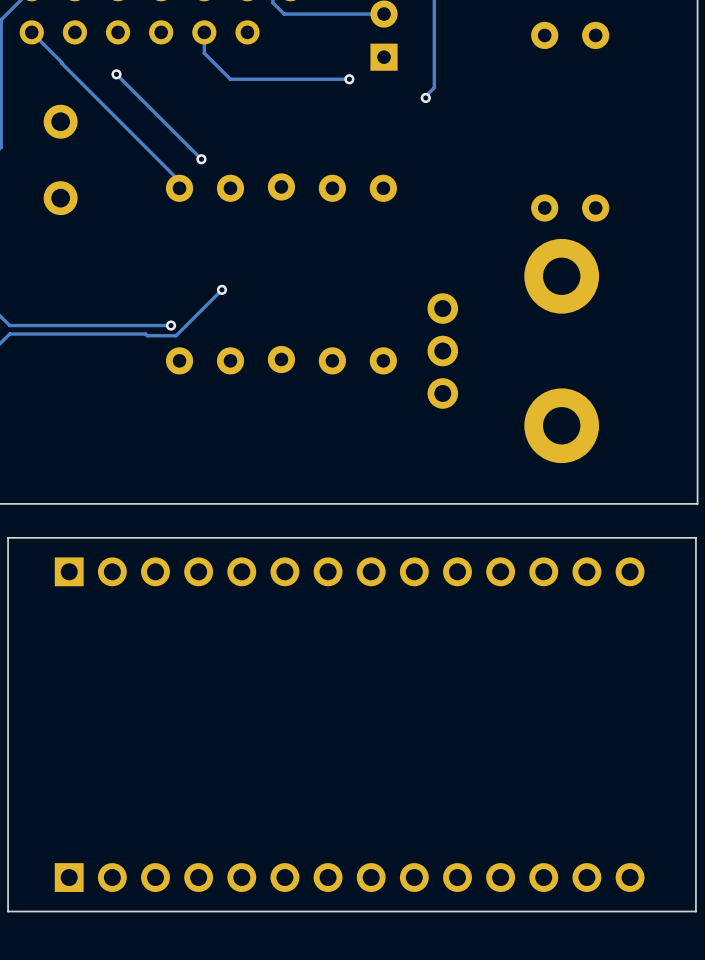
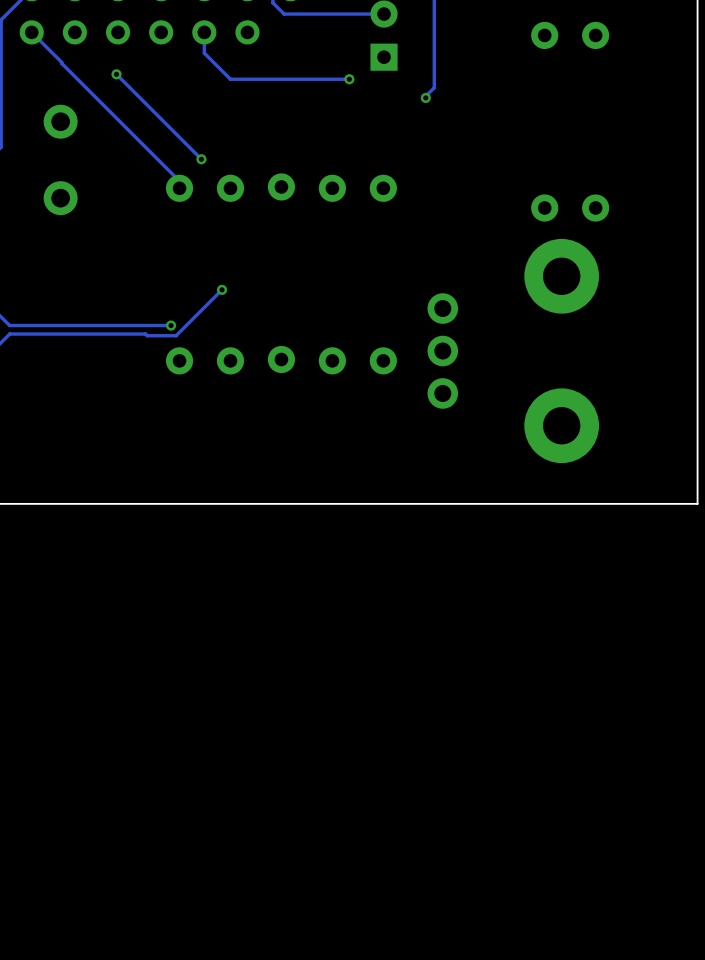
board edge: (695, 537) (8, 537) (8, 911) (695, 911) (695, 537) -> none
part: (349, 571) -> none
part: (349, 877) -> none

